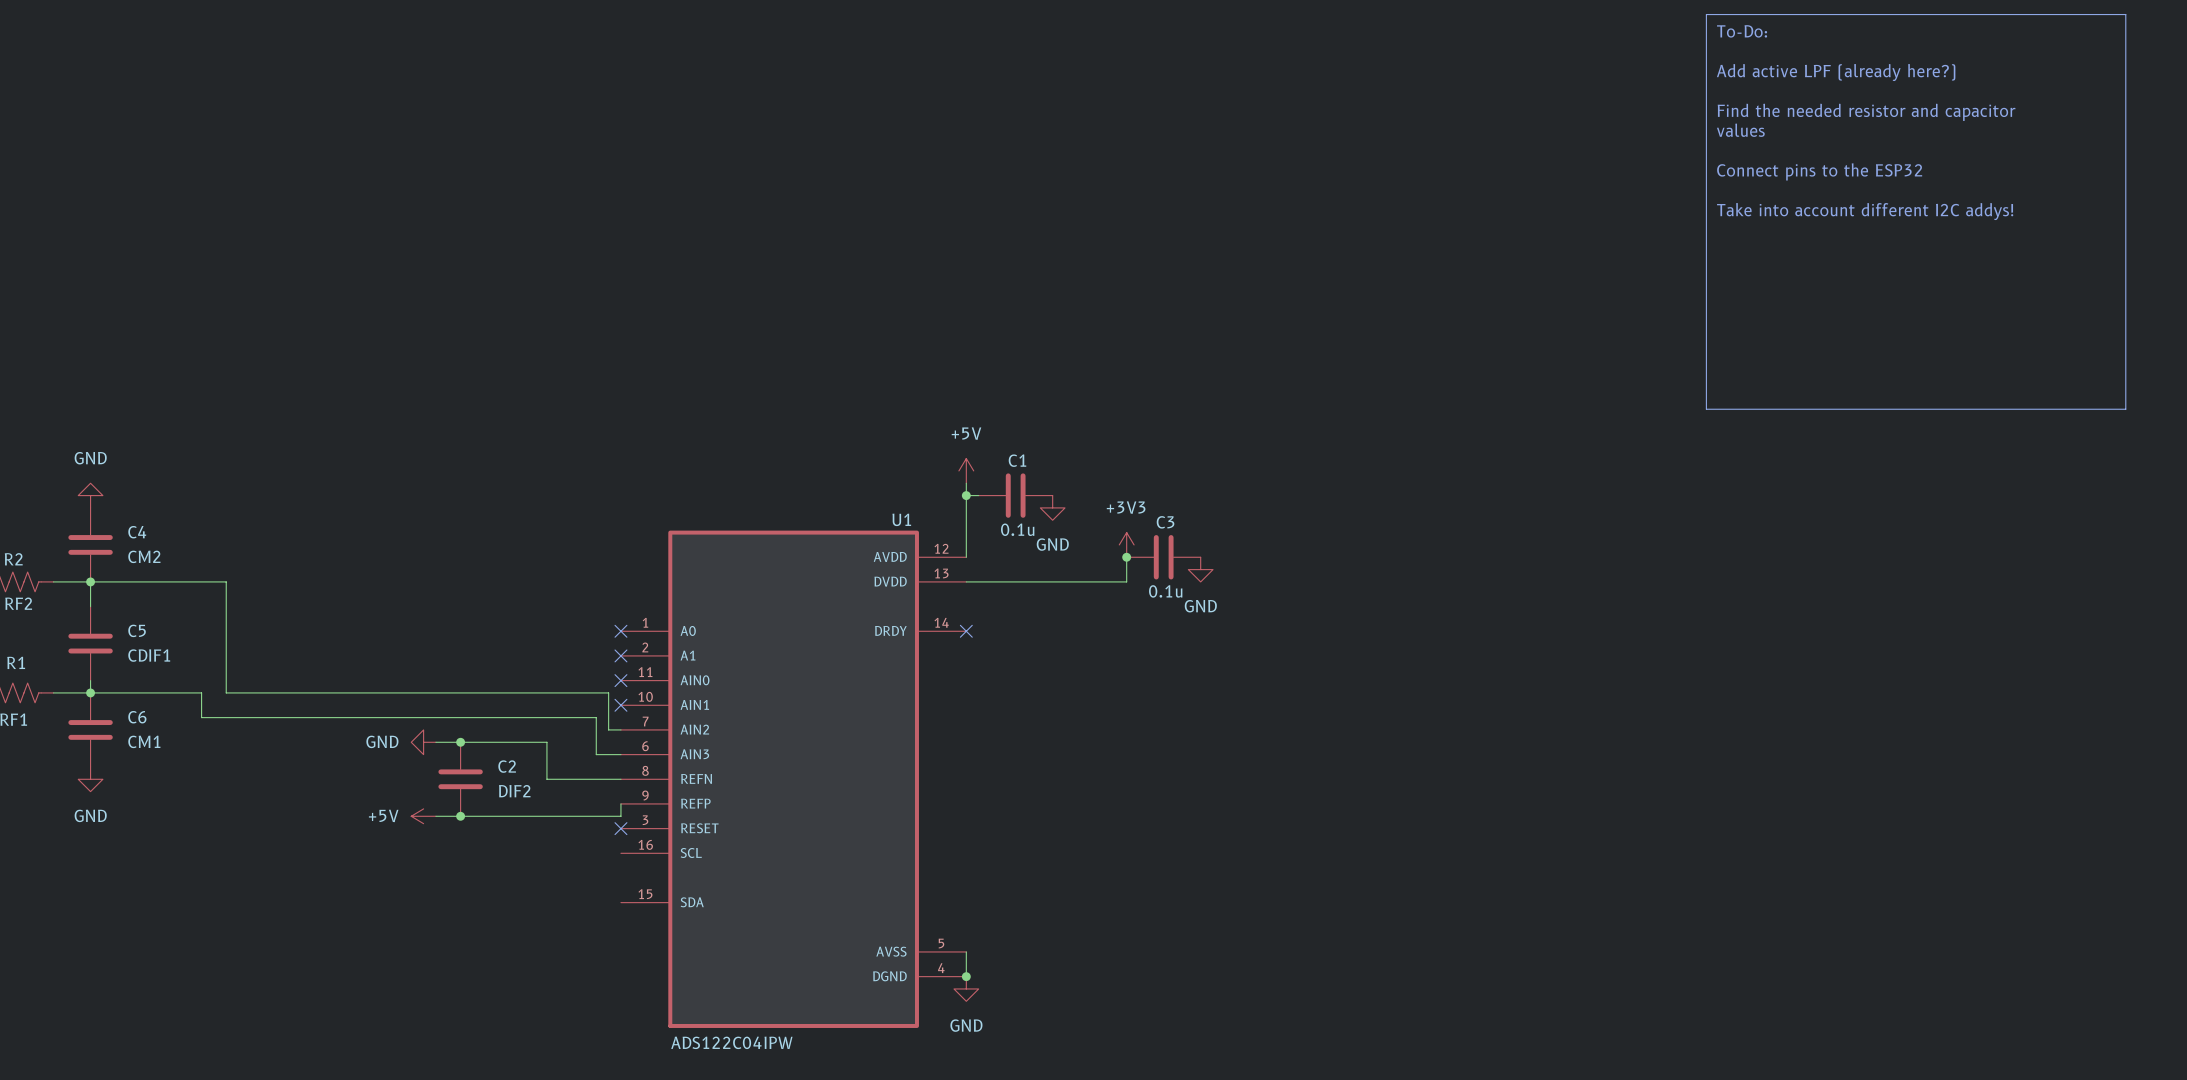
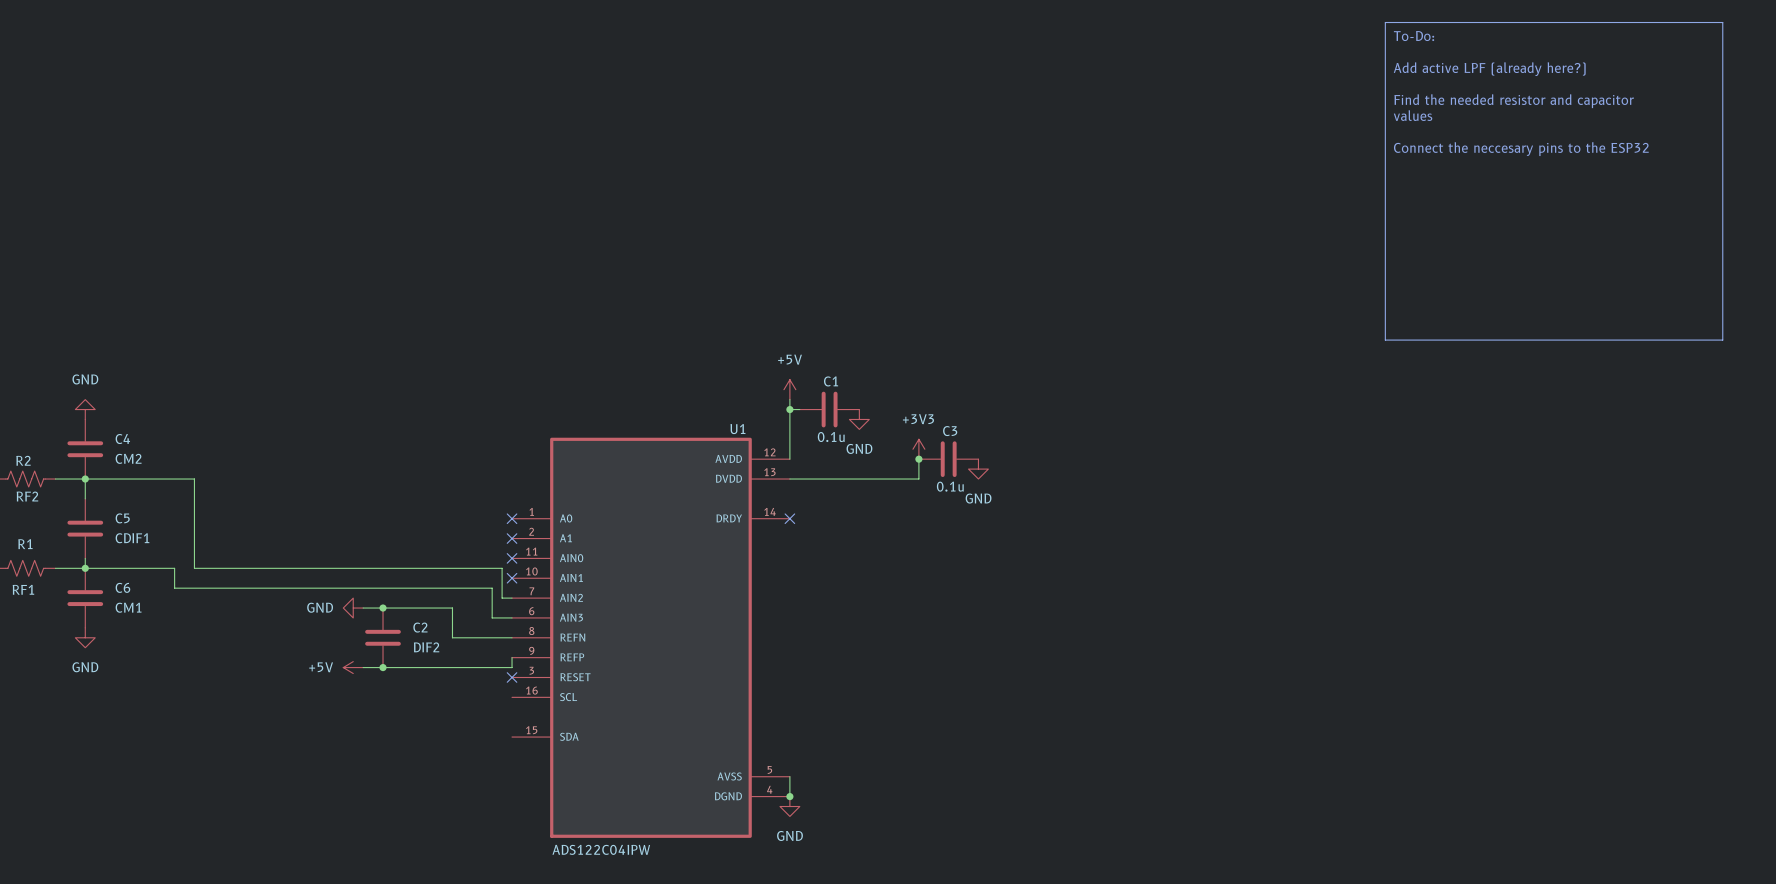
text: Connect pins to the ESP32 (1819, 171) -> Connect the neccesary pins to the ESP32 (1521, 149)
text: Take into account different I2C addys! (1865, 211) -> none

